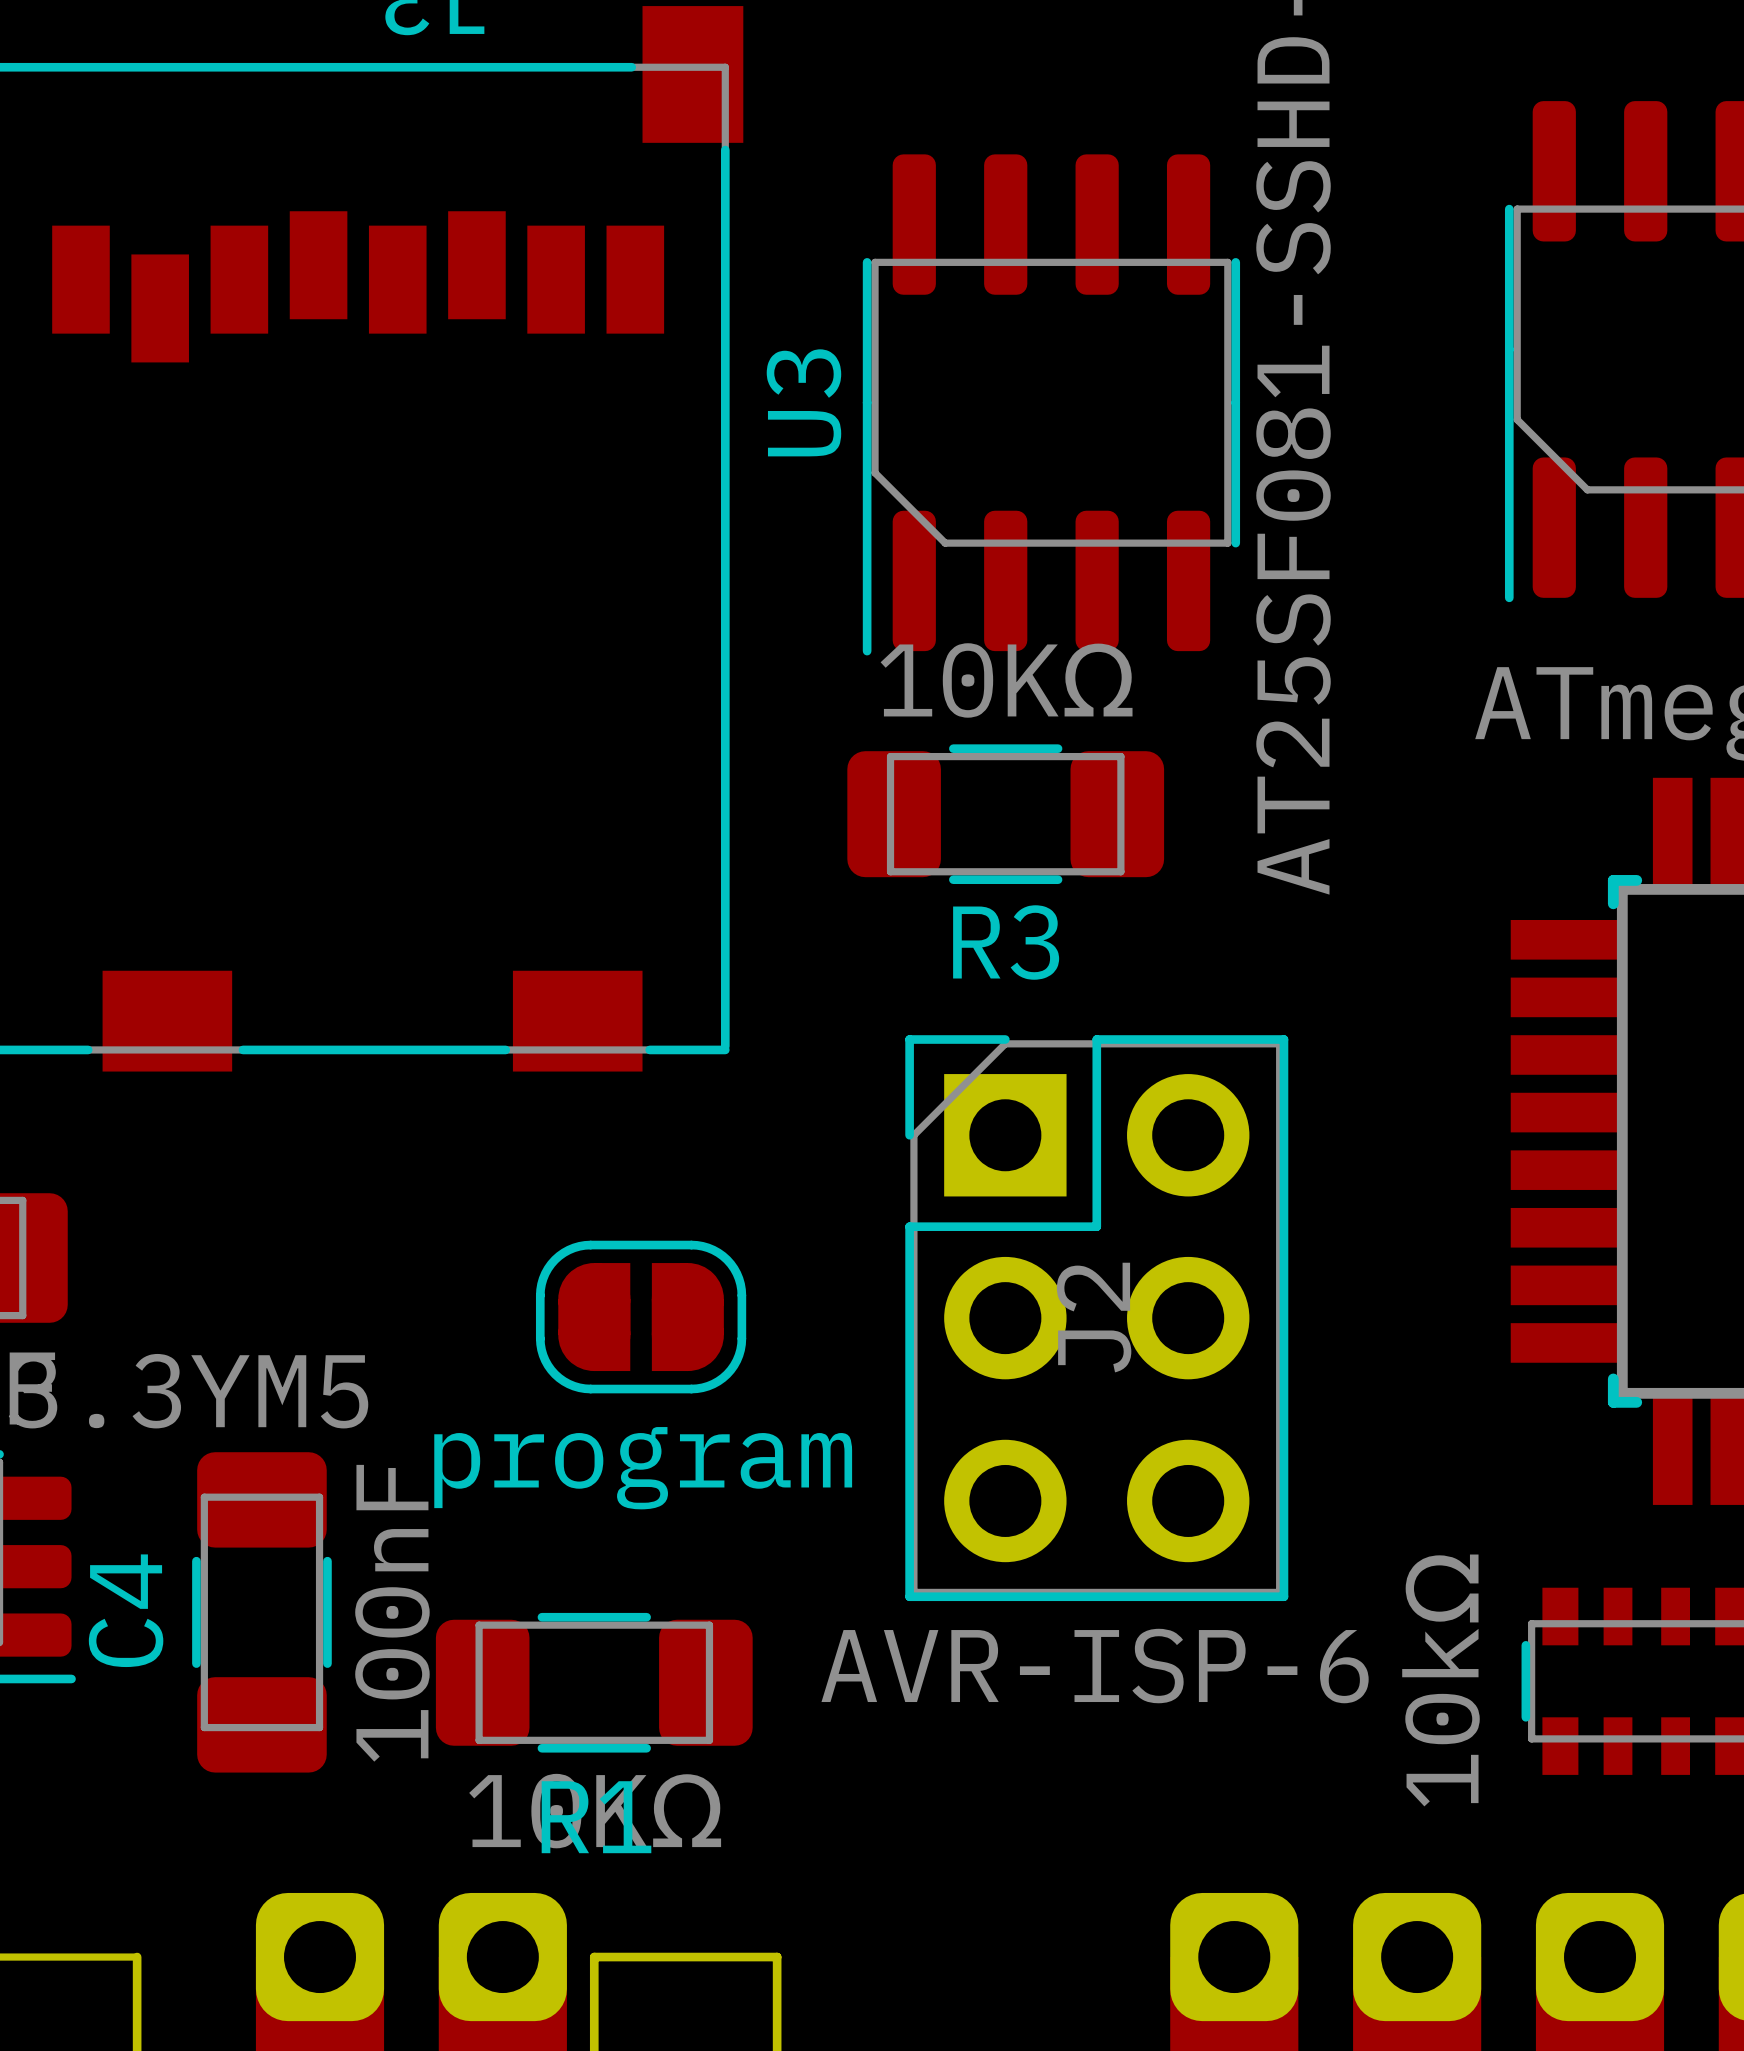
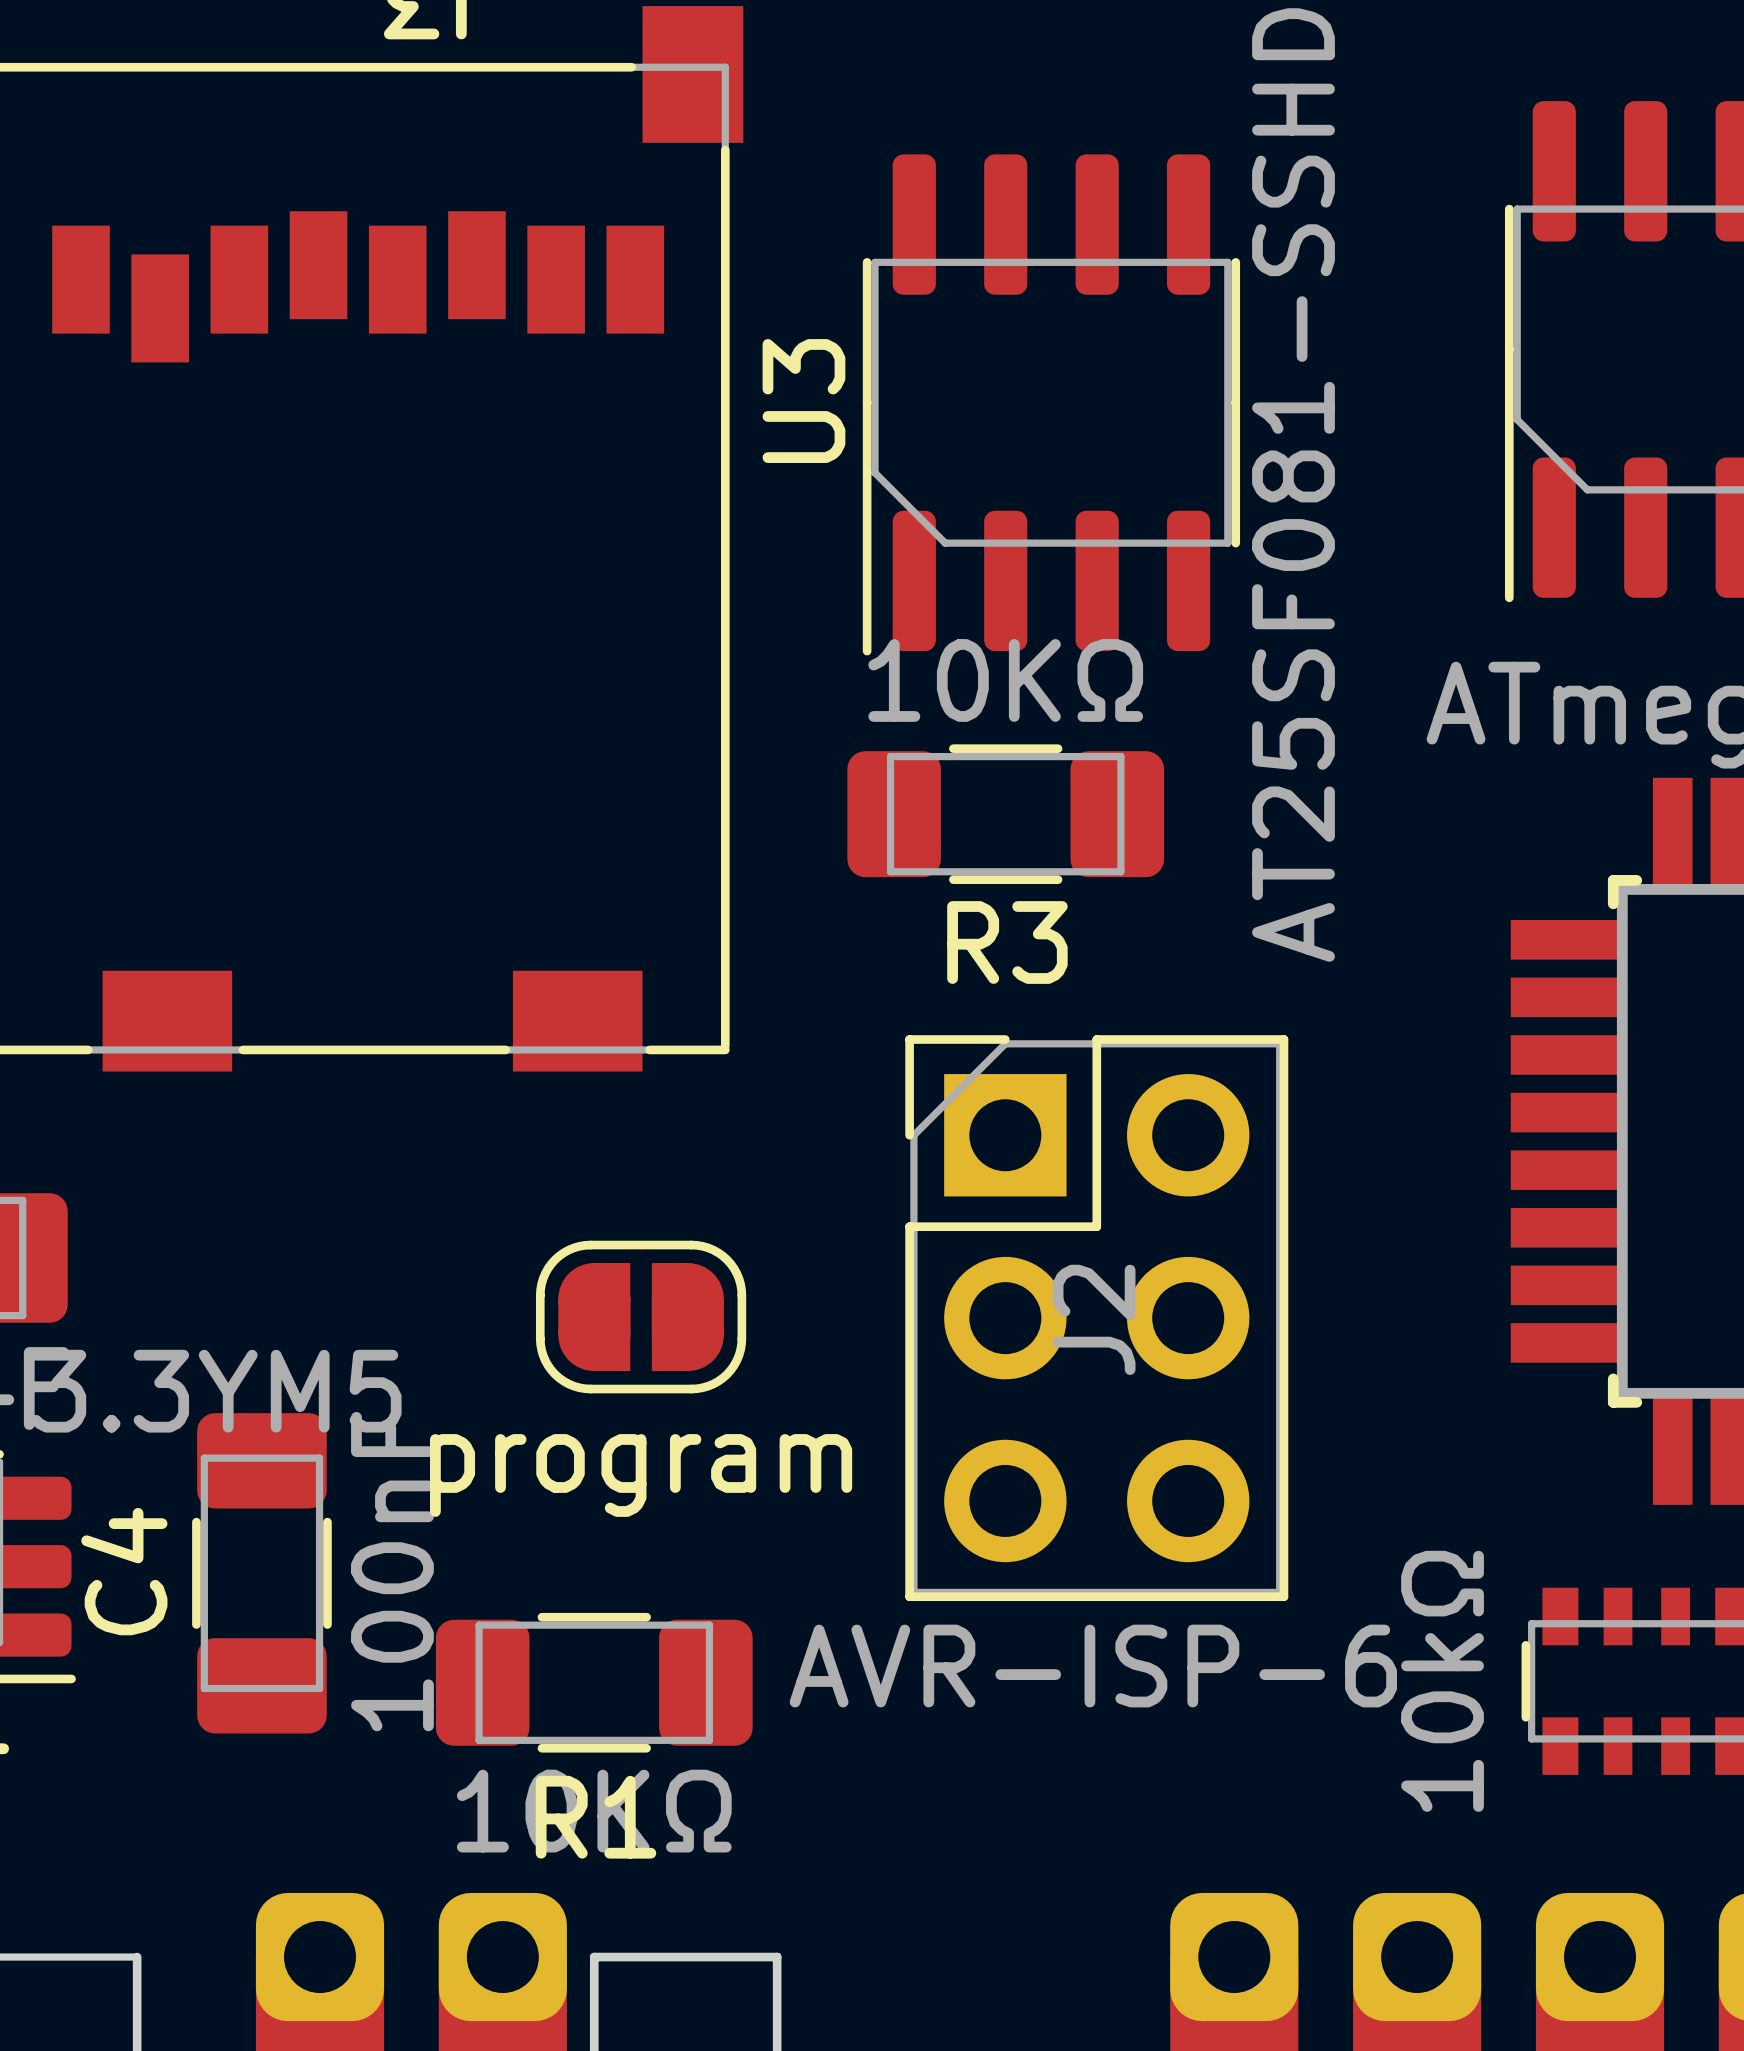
C4 position: (261, 1612) -> (261, 1573)

